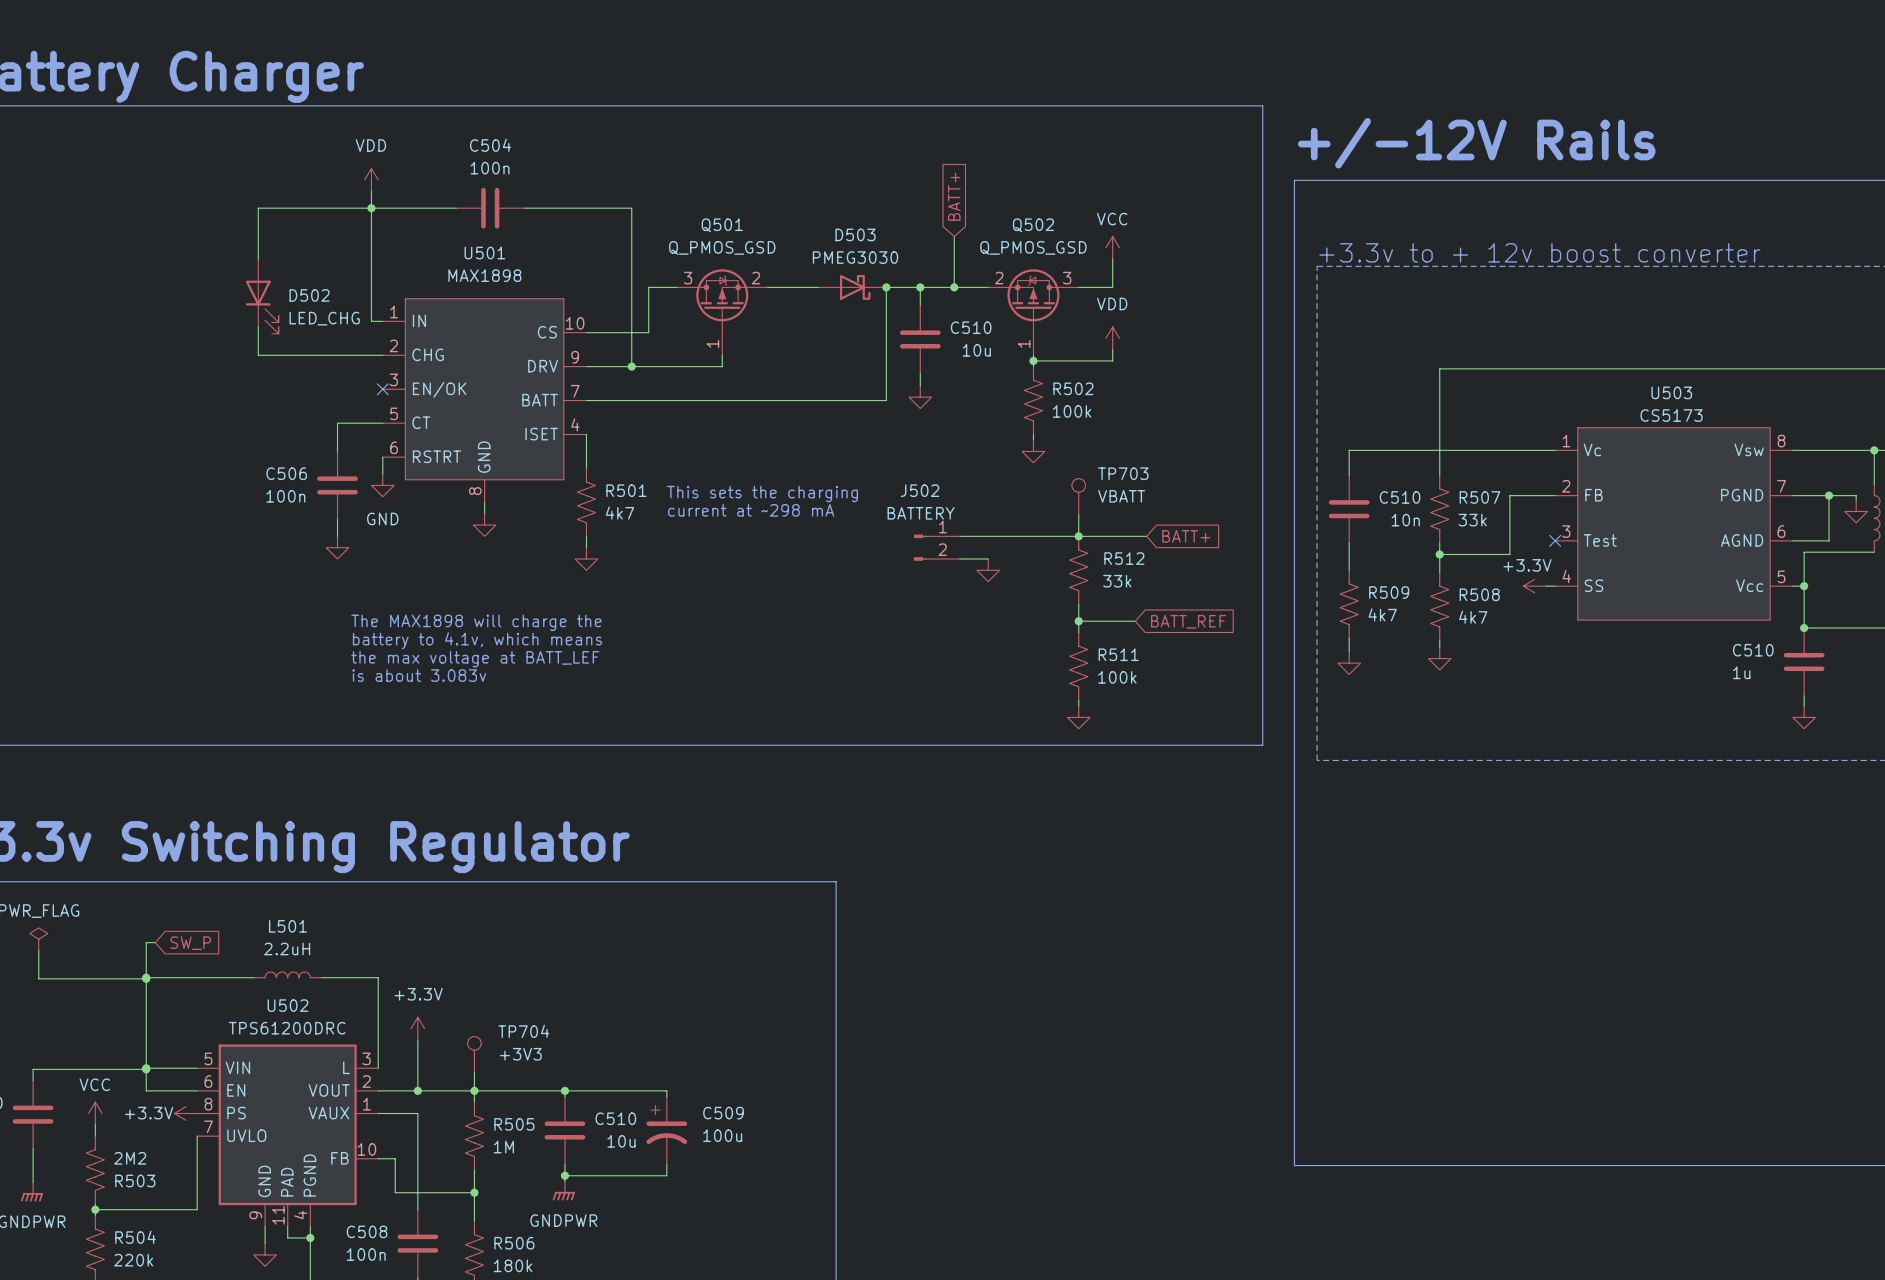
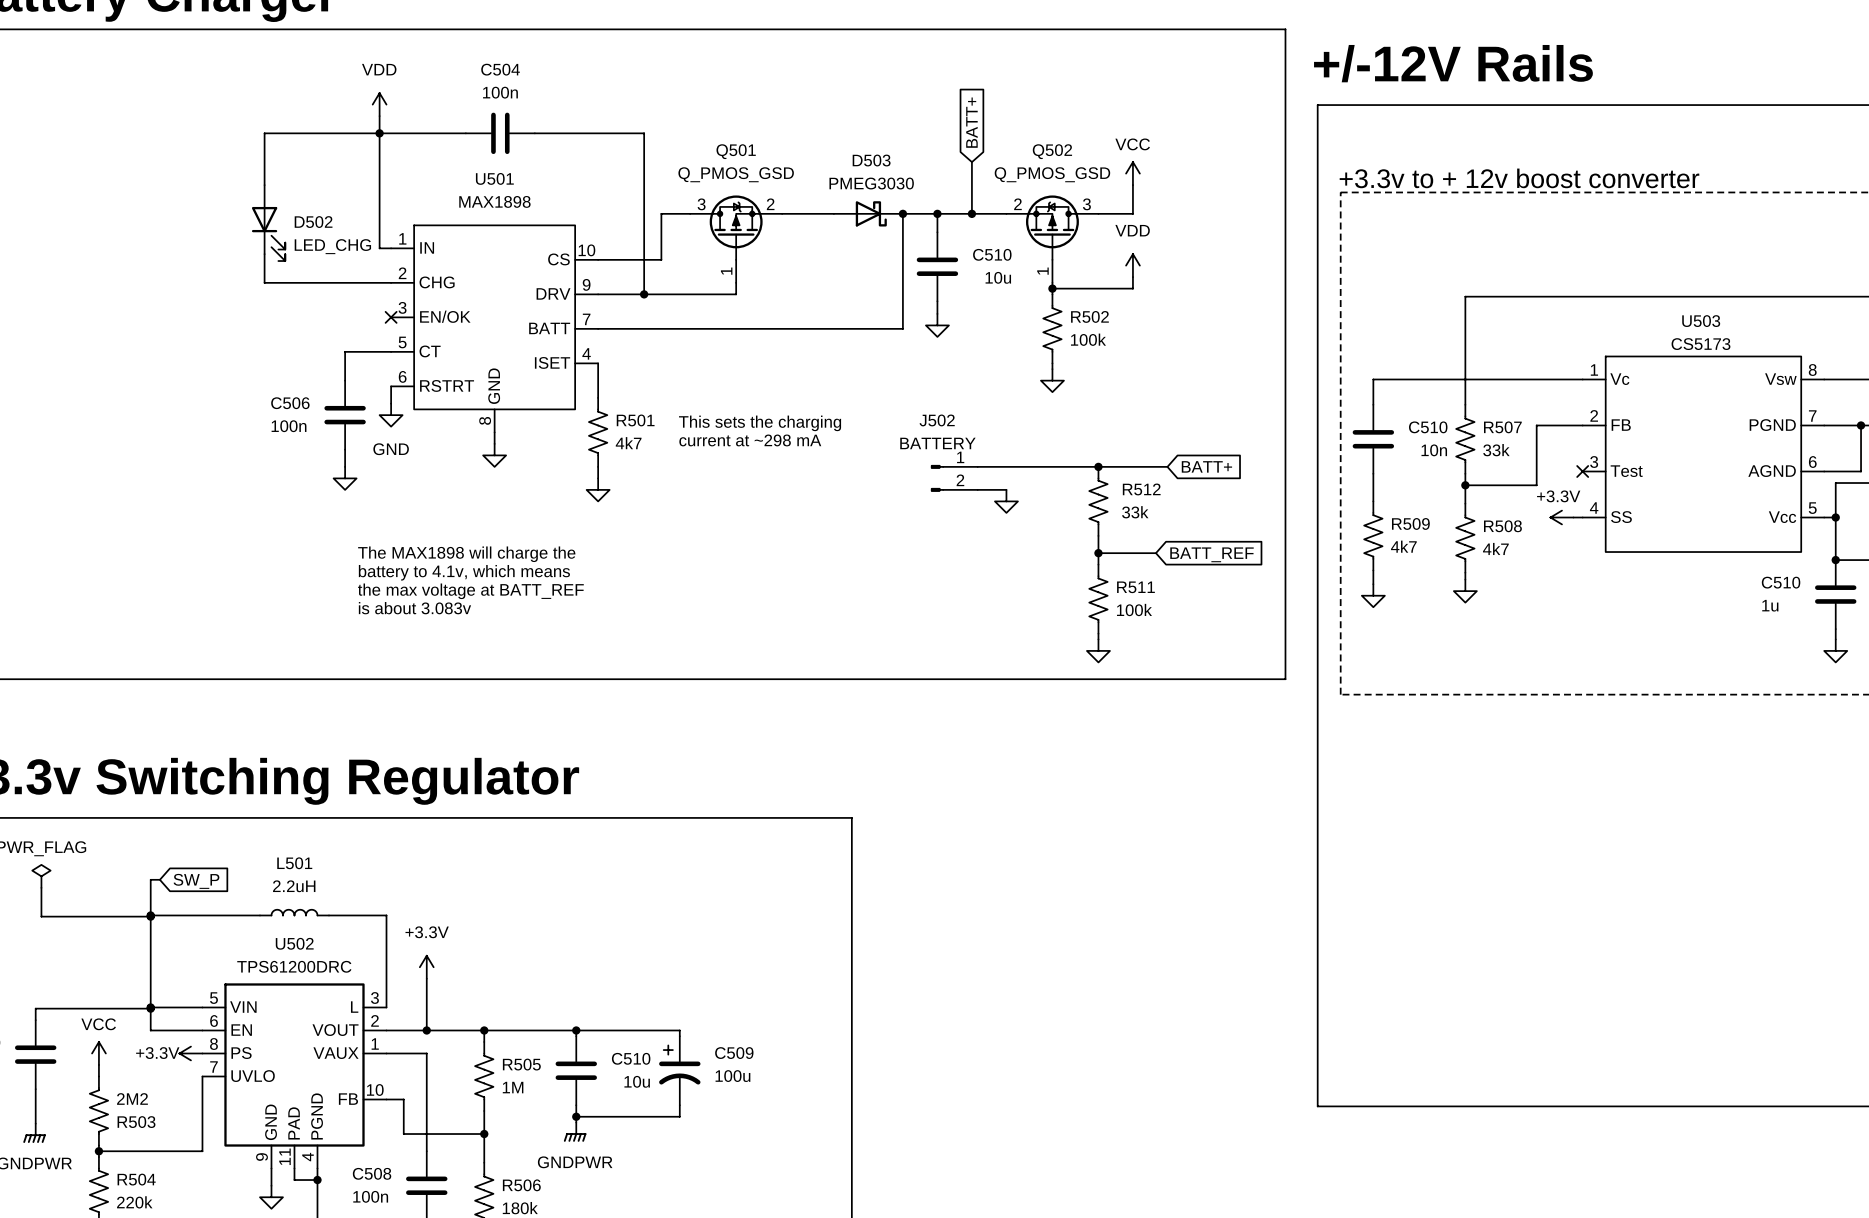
TP703: VBATT (1078, 496) -> none
wire: (1078, 514) (1078, 536) -> none
text: the max voltage at BATT_LEF (475, 659) -> the max voltage at BATT_REF (470, 591)
TP704: +3V3 (474, 1054) -> none
wire: (474, 1072) (474, 1090) -> none

